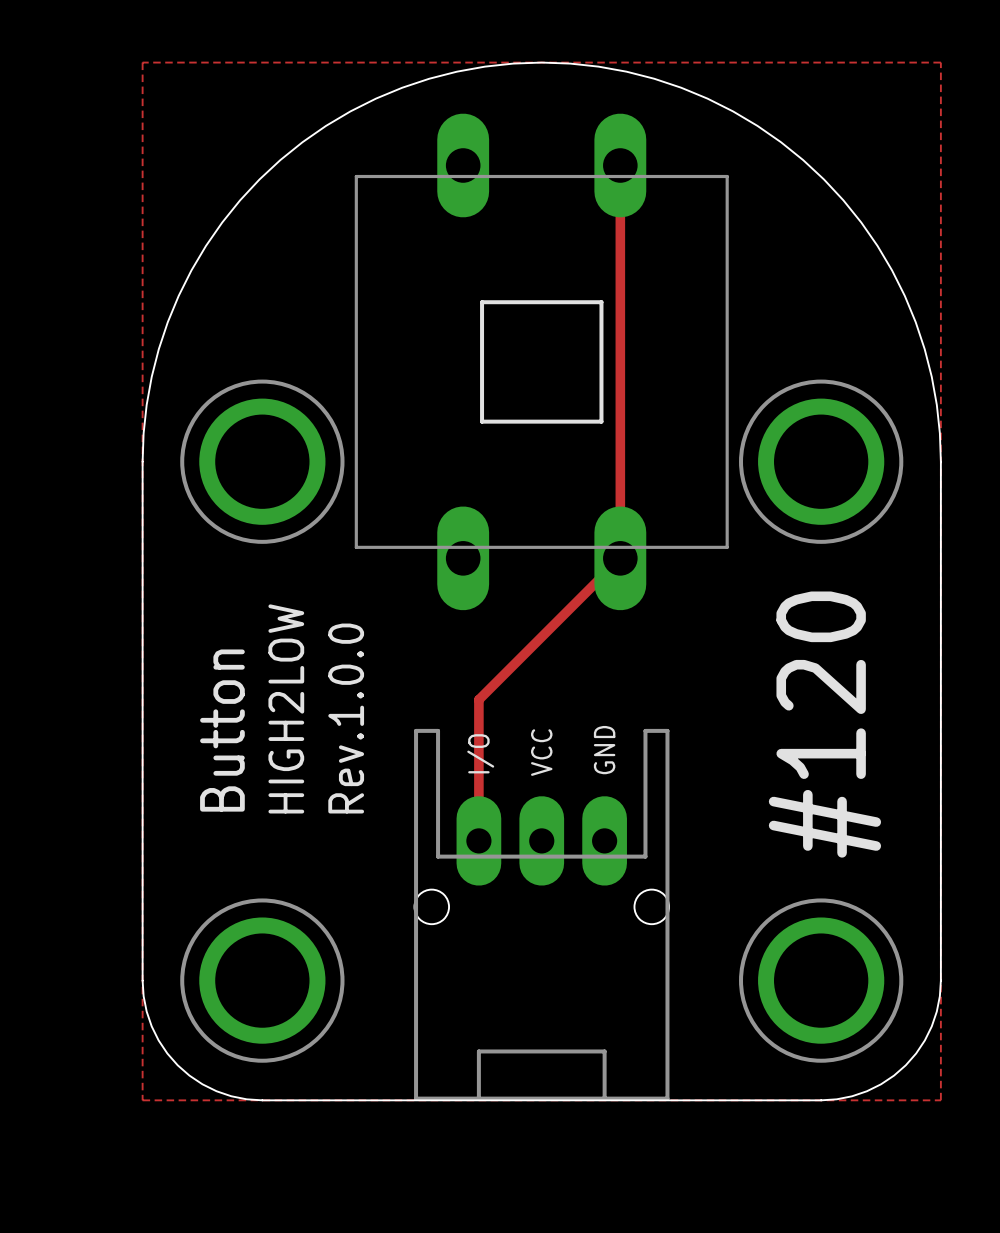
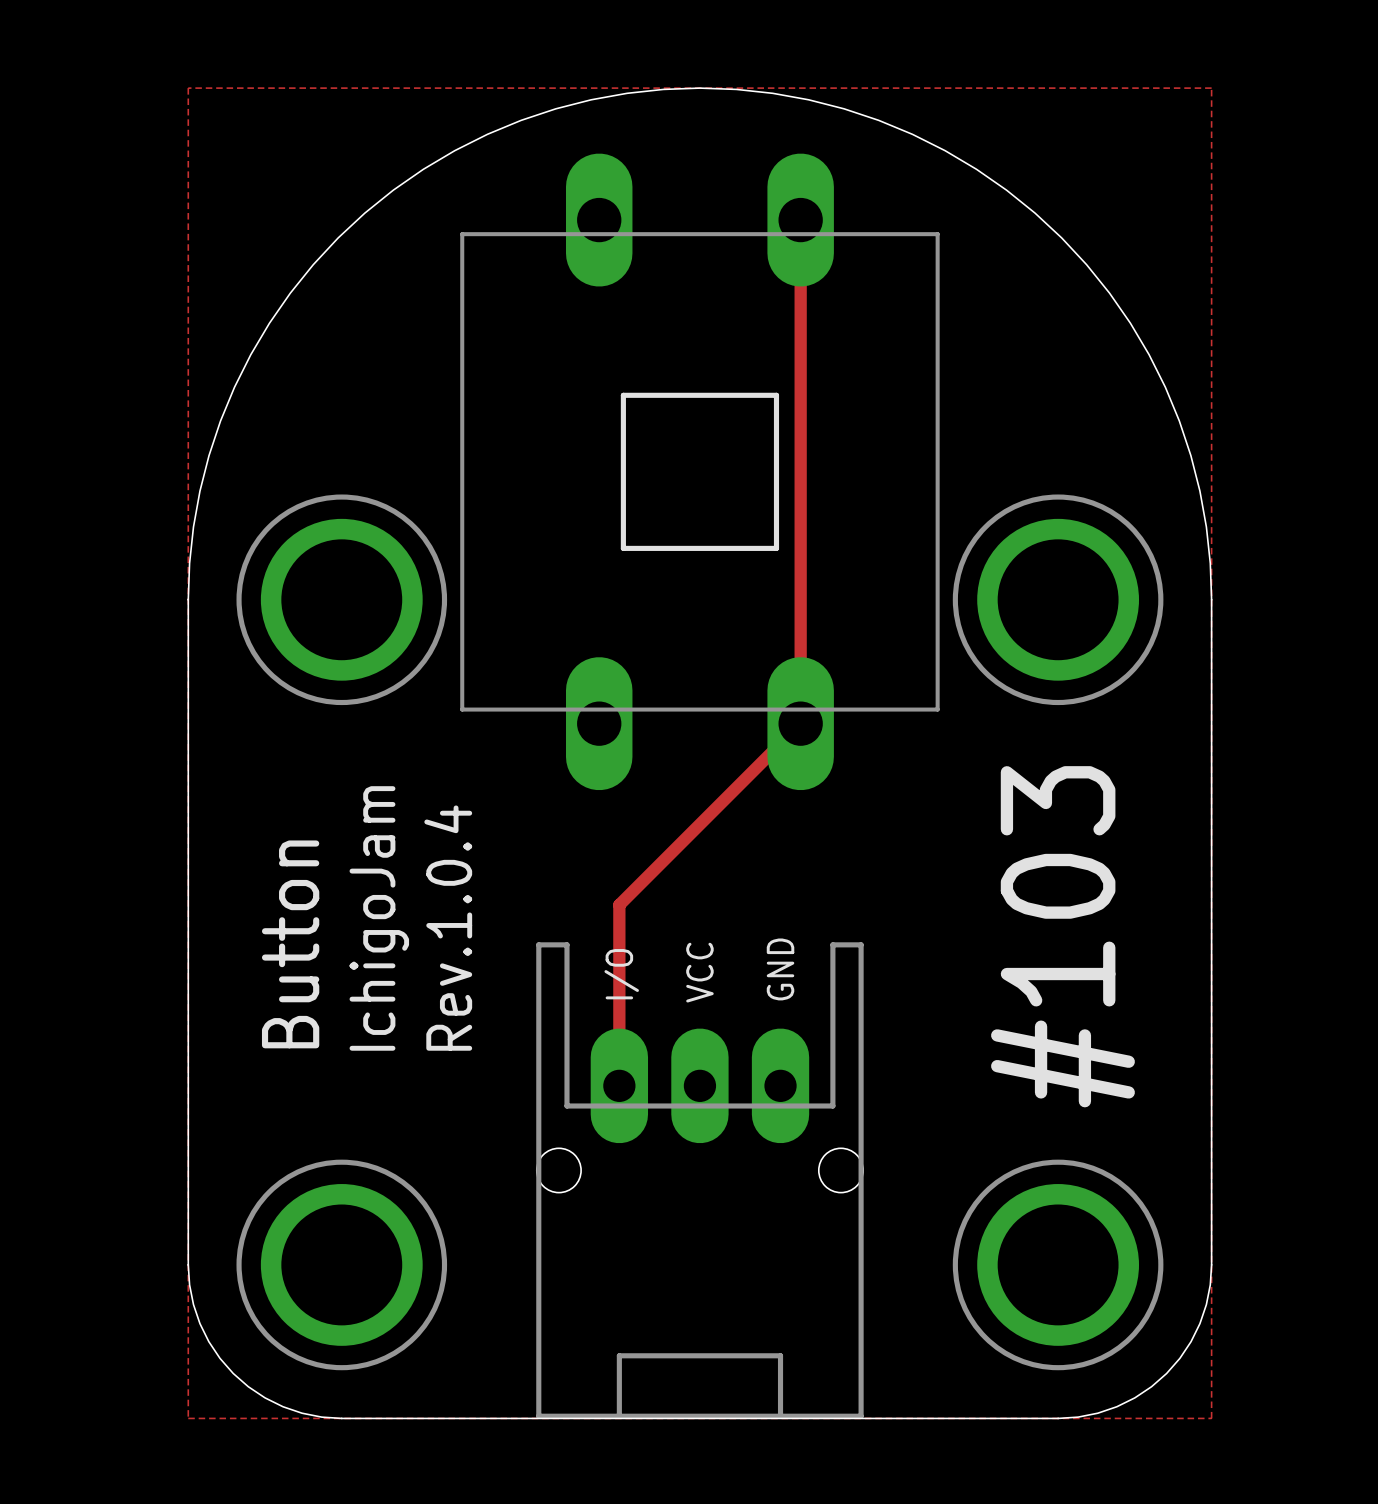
text: HIGH2LOW (286, 708) -> IchigoJam (379, 918)
text: Rev.1.0.0 (346, 718) -> Rev.1.0.4 (448, 928)
text: #120 (824, 724) -> #103 (1062, 936)

